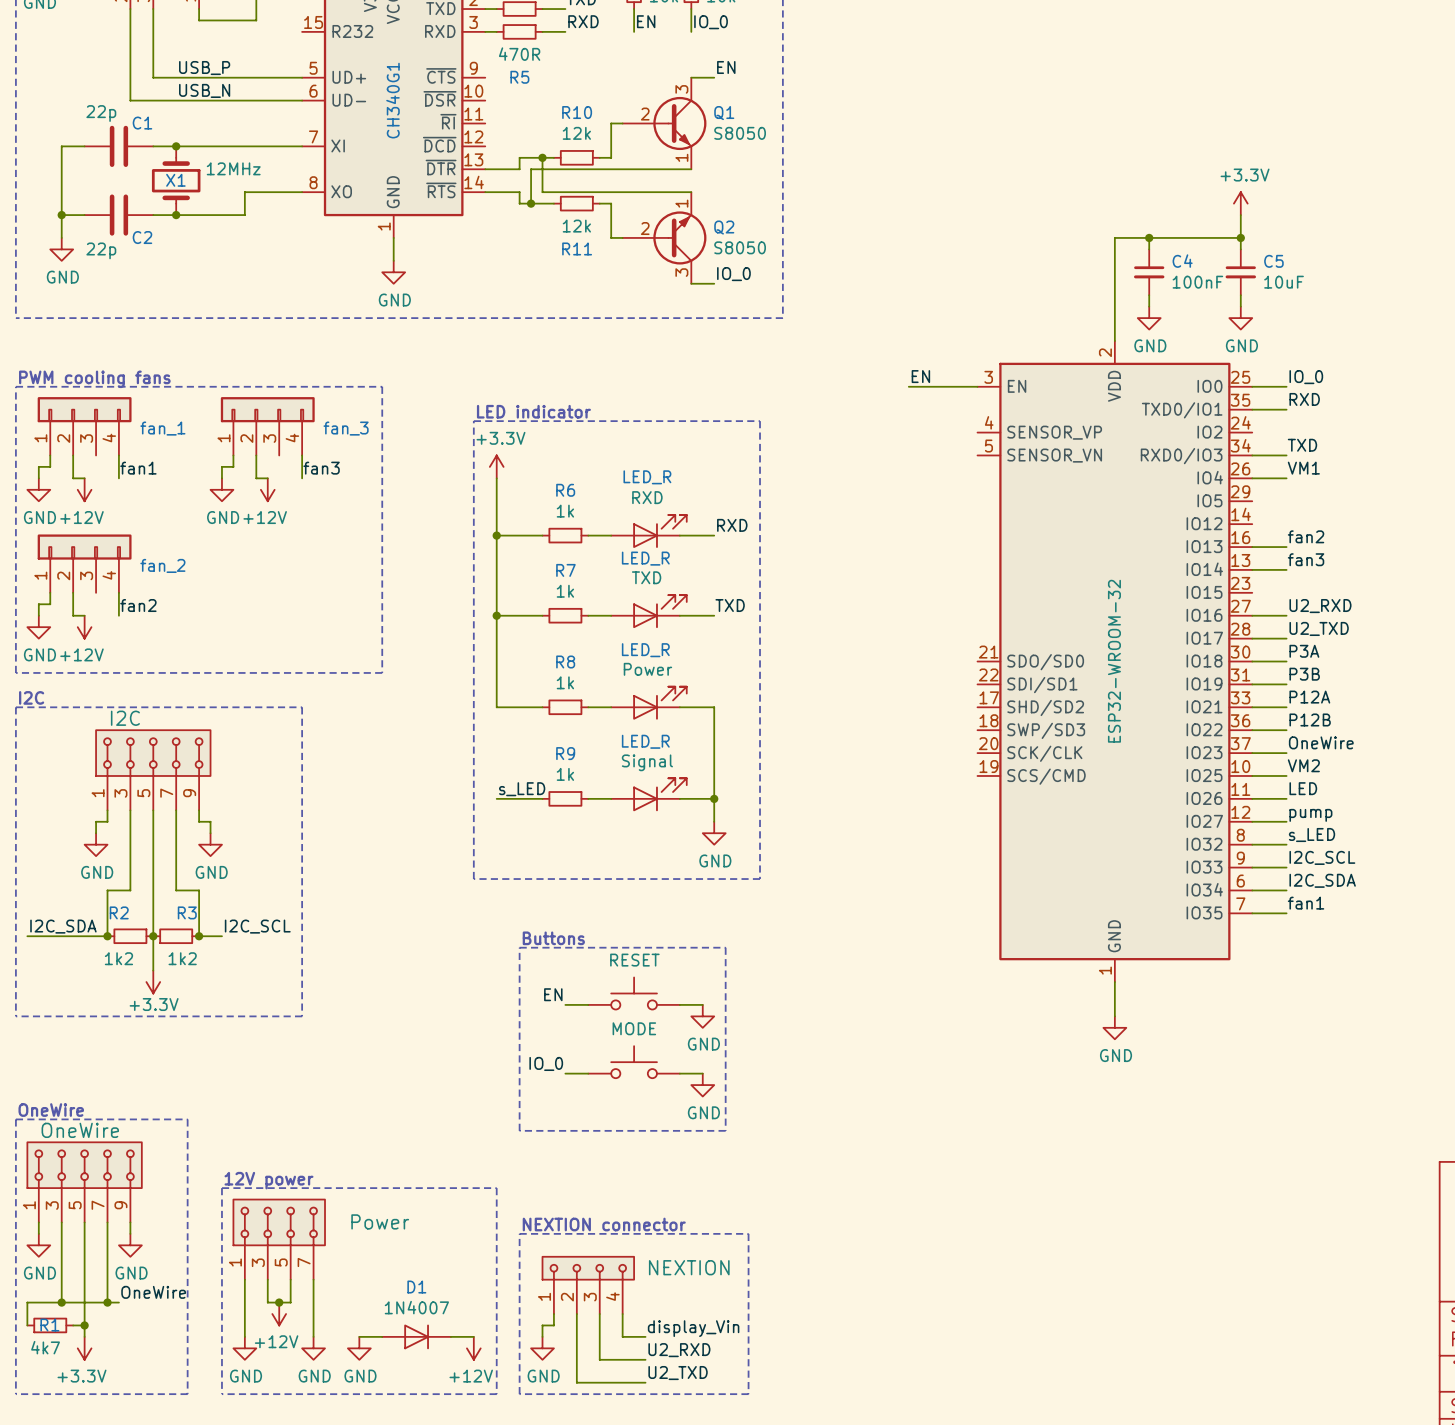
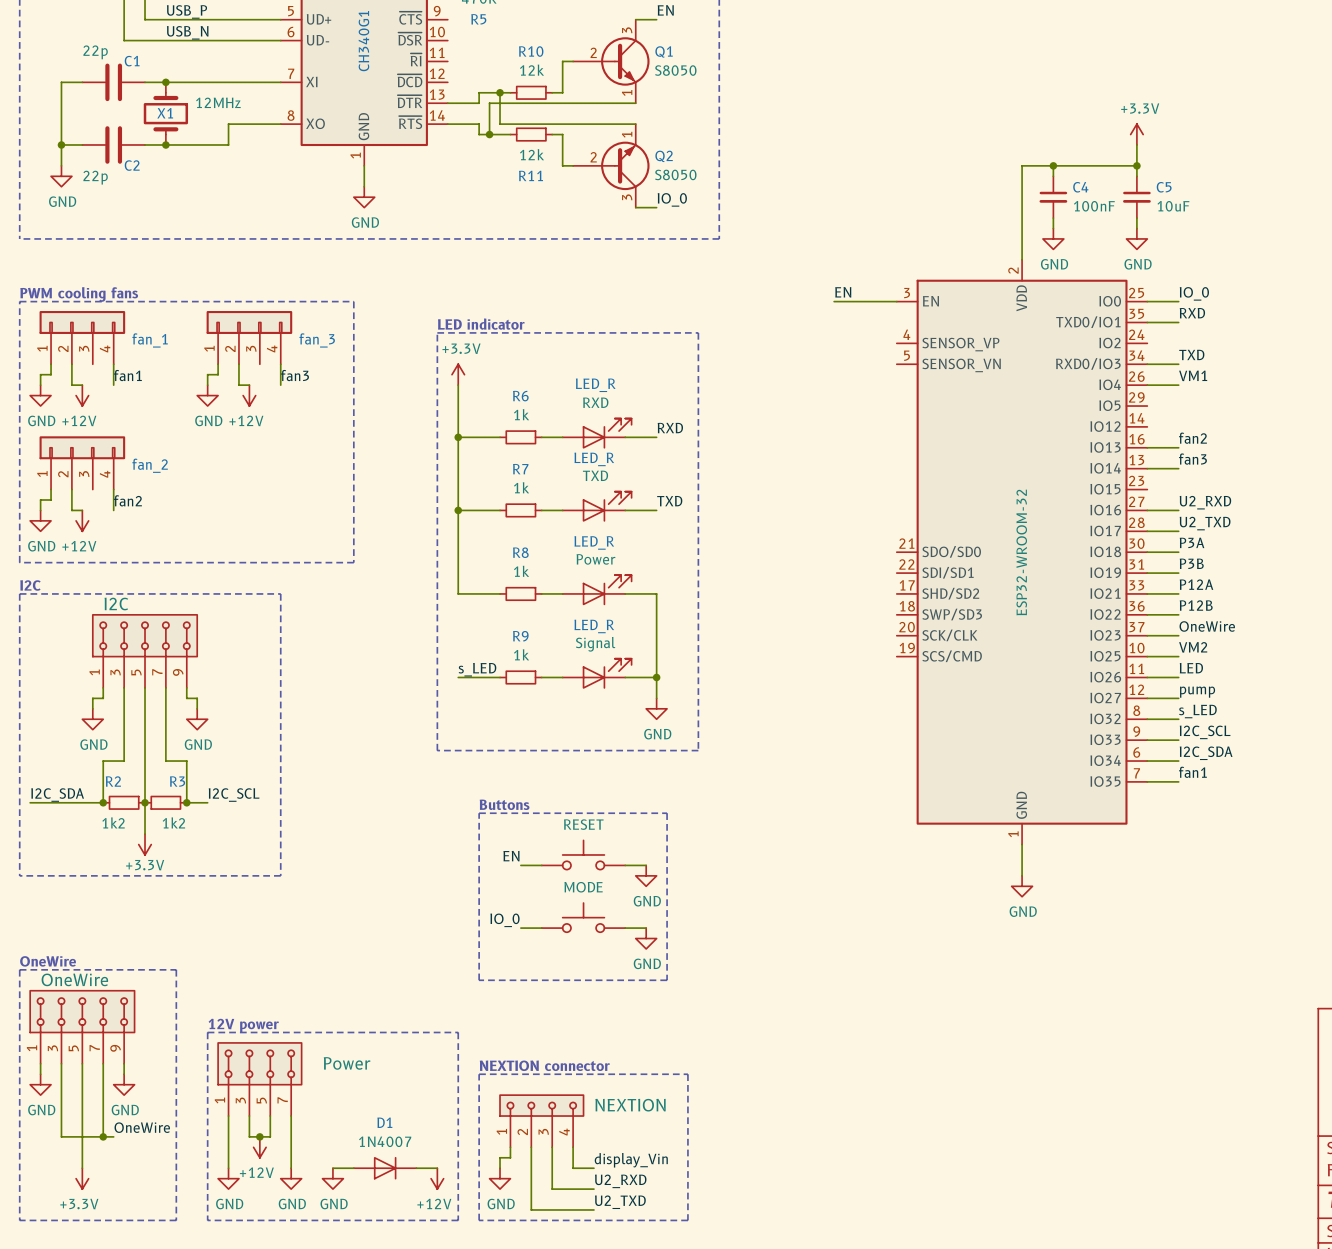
wire: (61, 1302) (27, 1302) (27, 1325) -> none
junction: (61, 1302) -> none
R1: 4k7 (50, 1325) -> none
wire: (73, 1325) (84, 1325) -> none
junction: (84, 1325) -> none

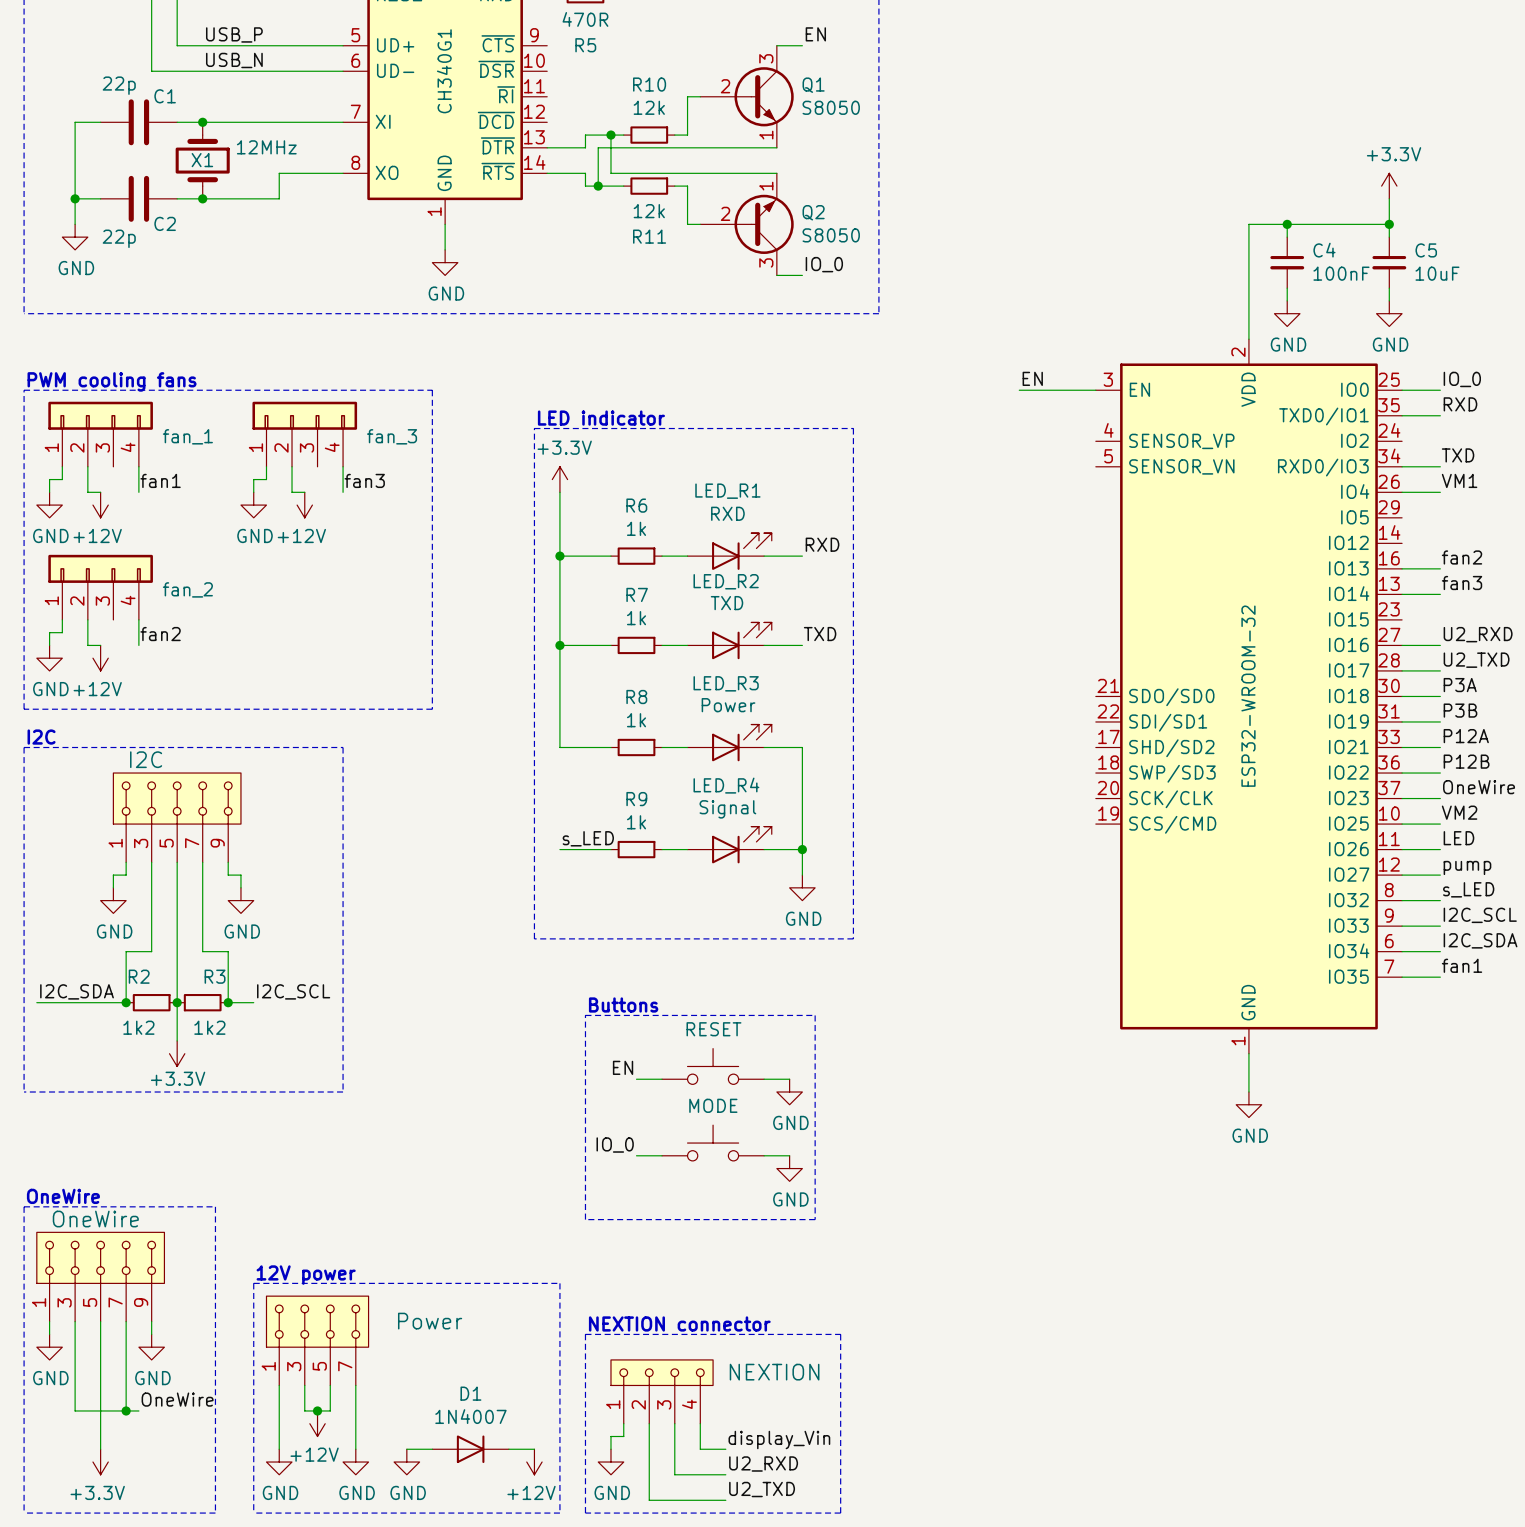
LED_R name: LED_R (595, 385) -> LED_R1 (727, 491)
LED_R name: LED_R (594, 459) -> LED_R2 (726, 581)
LED_R name: LED_R (594, 542) -> LED_R3 (726, 683)
LED_R name: LED_R (594, 626) -> LED_R4 (726, 785)

